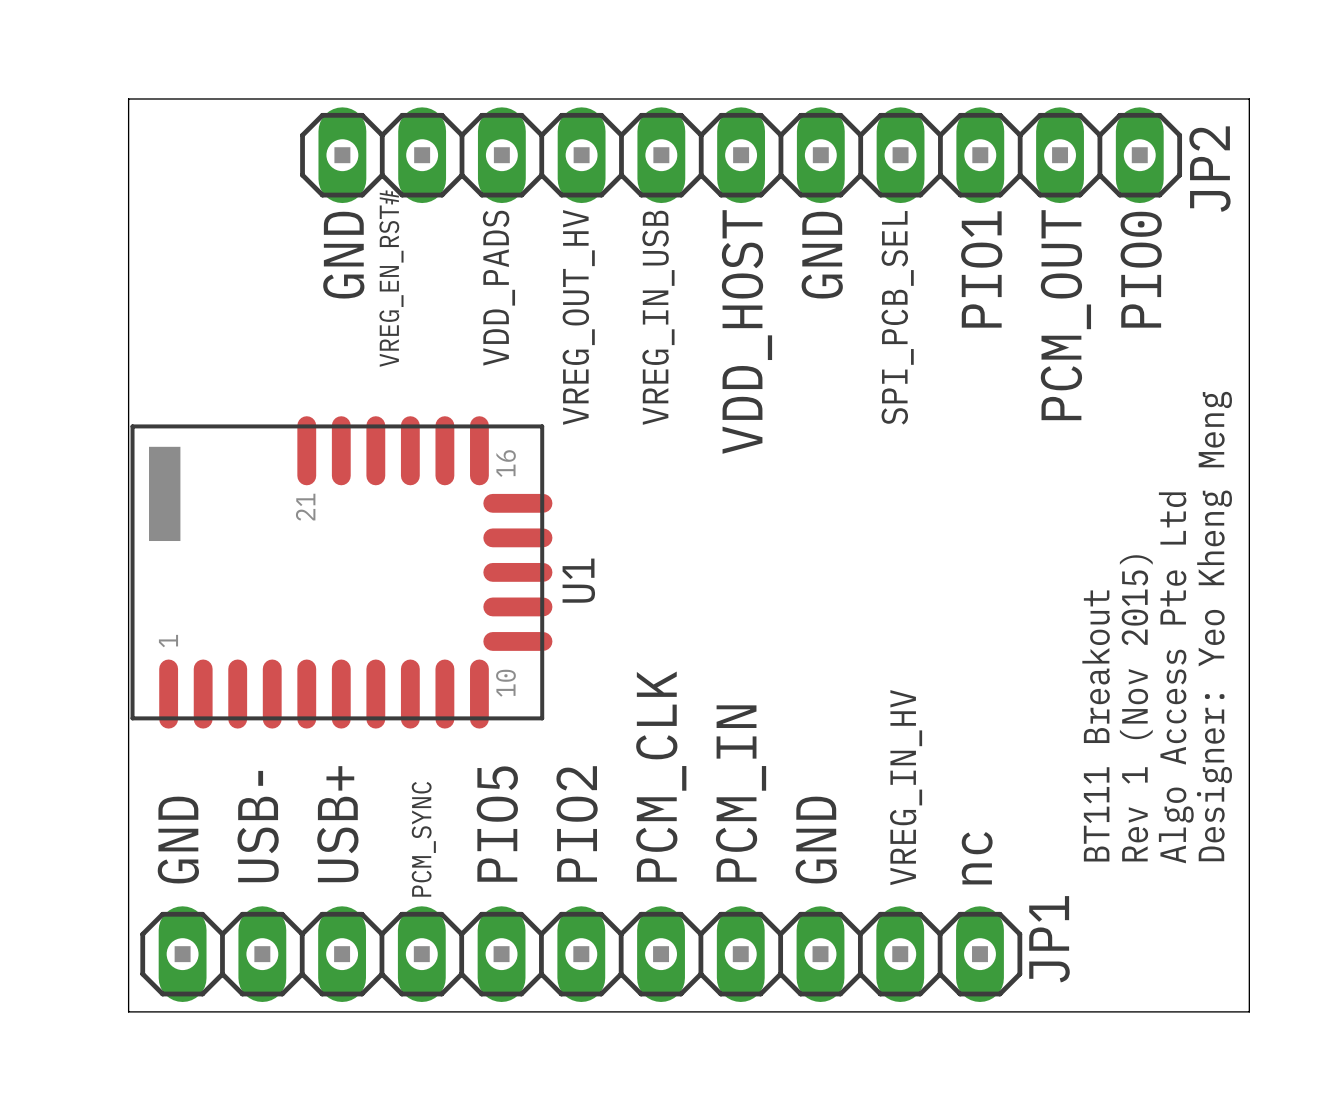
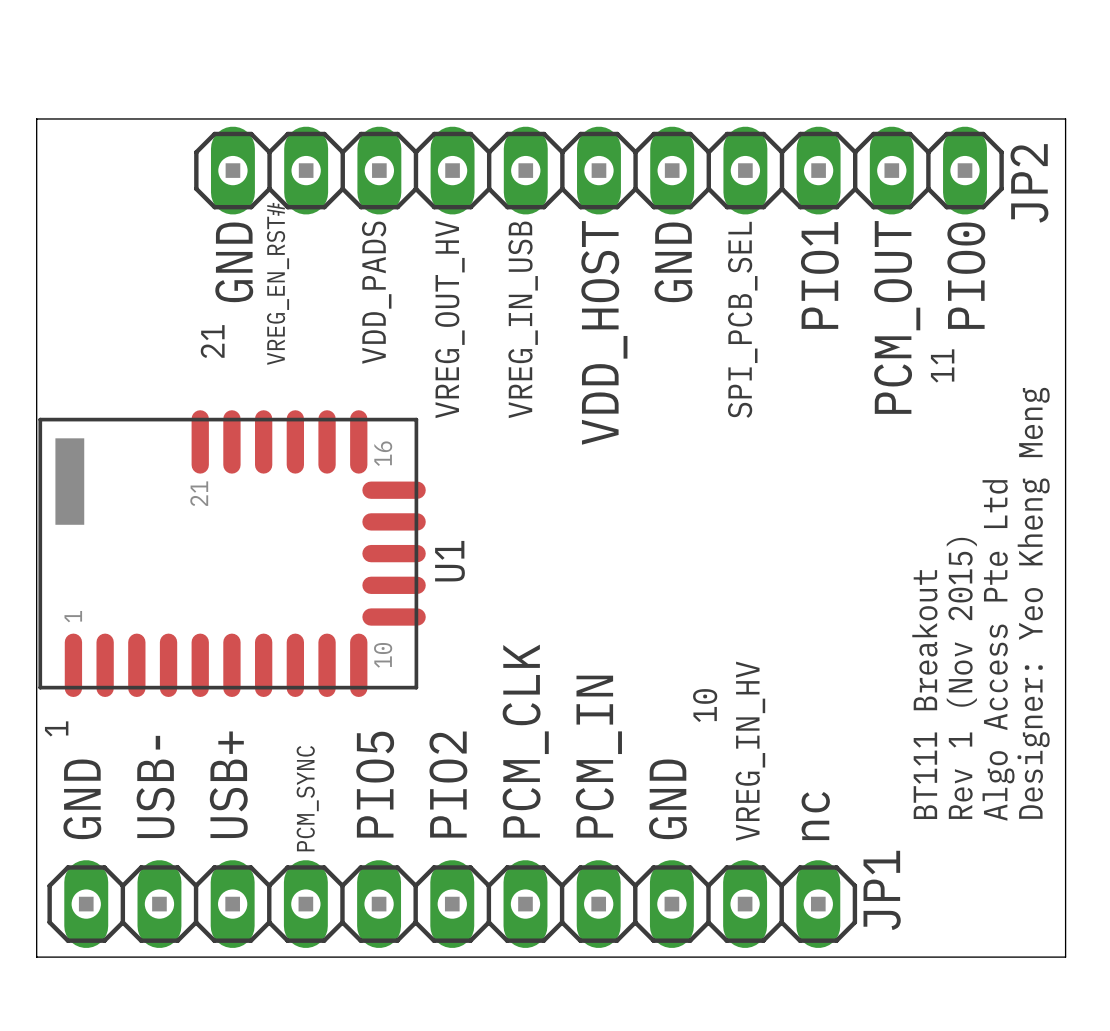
text: none -> 21 (212, 341)
text: none -> 11 (942, 365)
text: none -> 10 (705, 705)
text: none -> 1 (56, 728)

